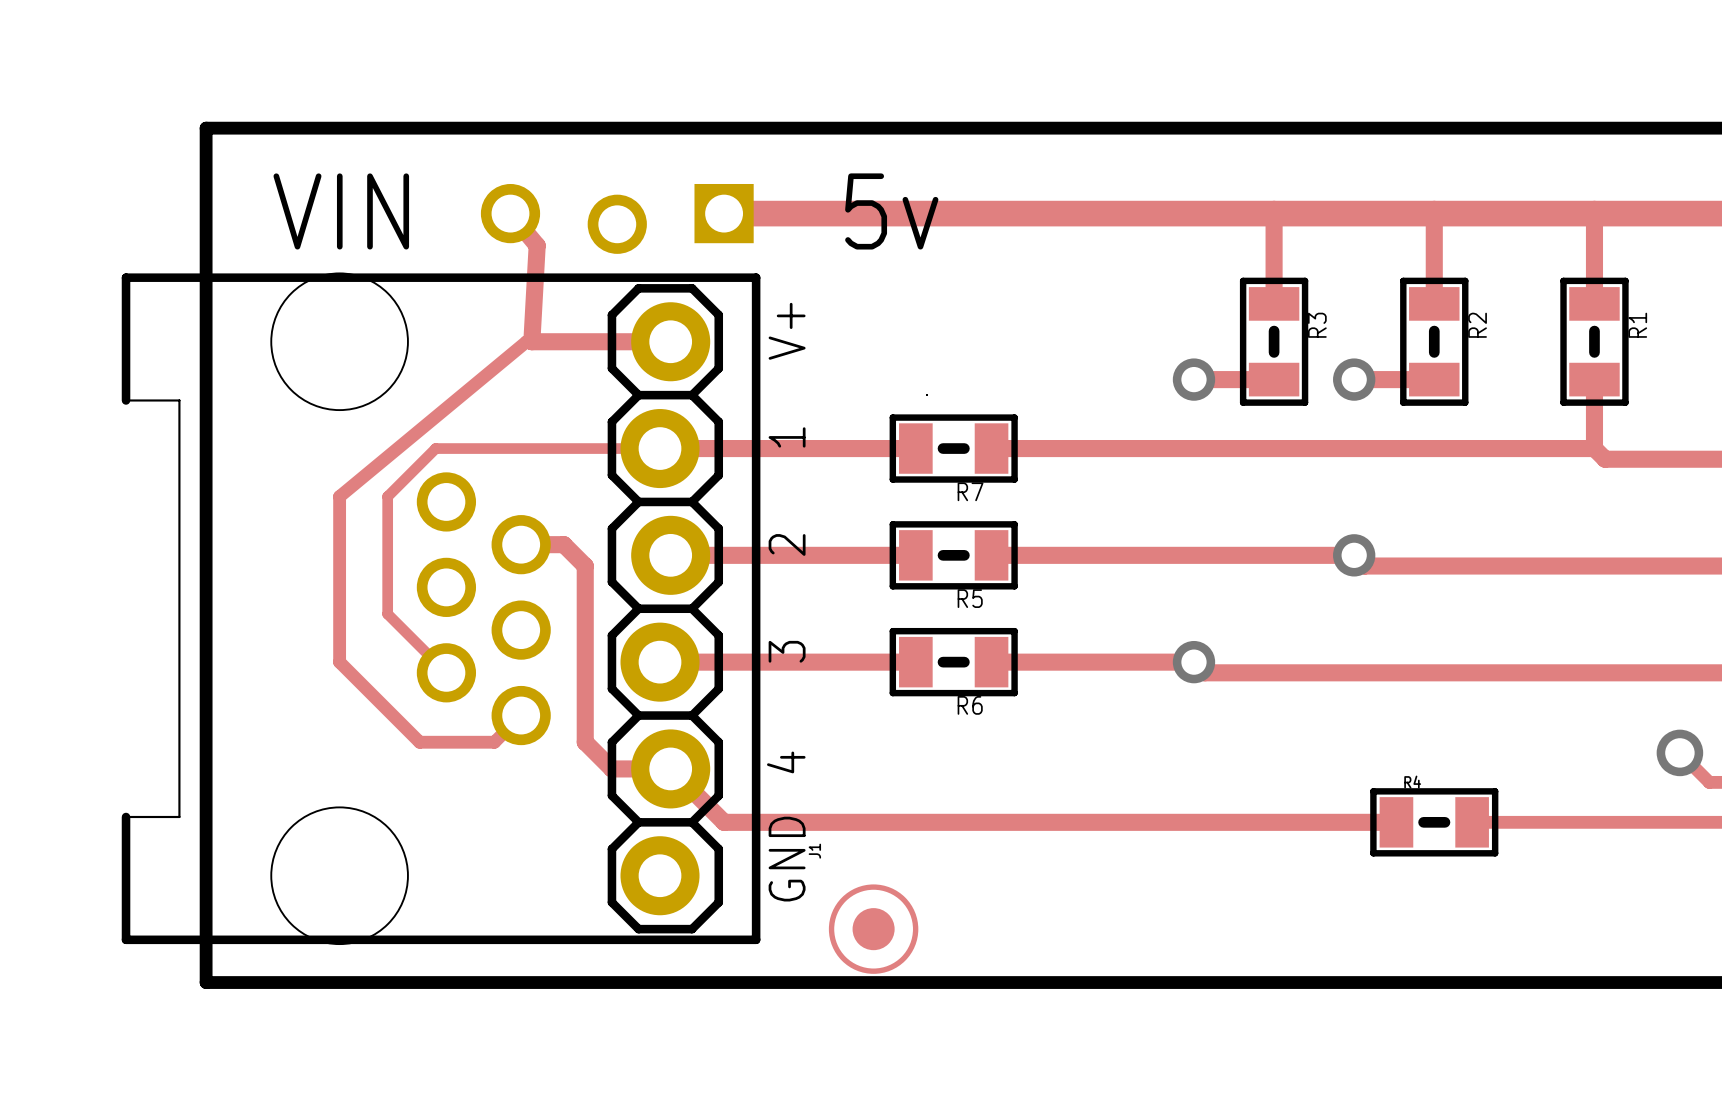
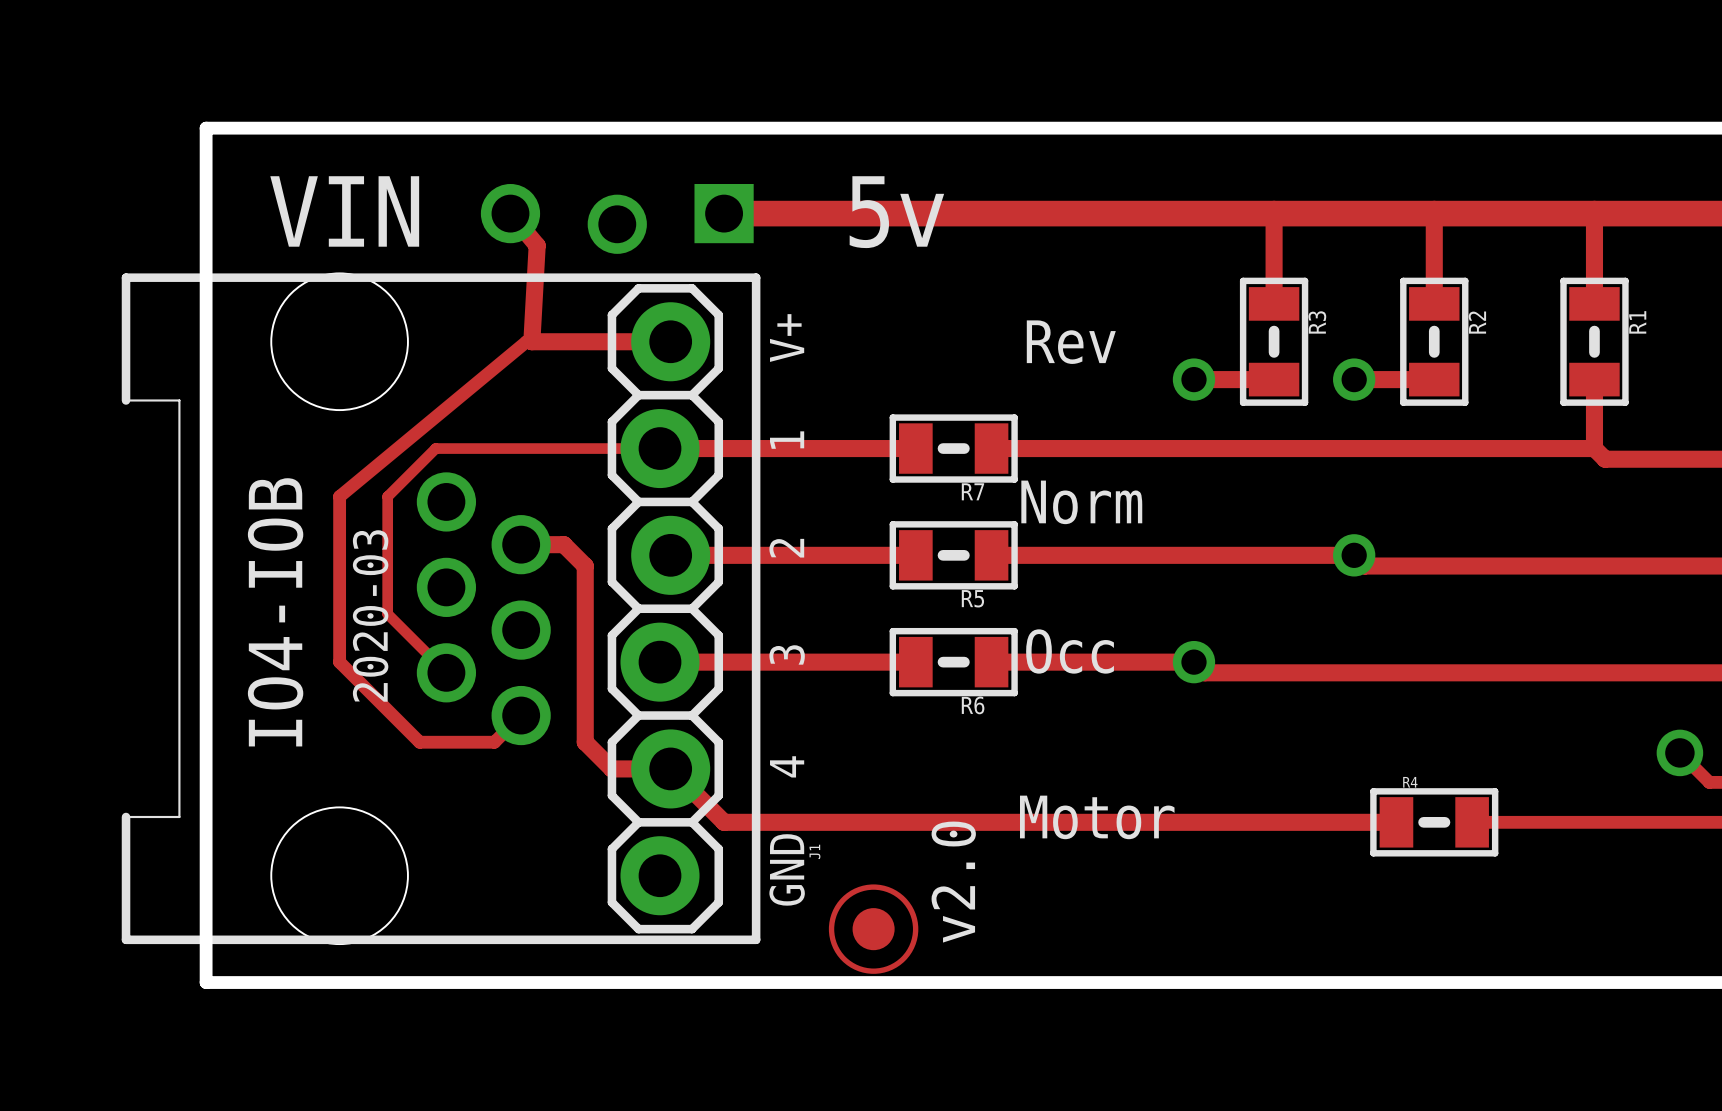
text: none -> Rev (1071, 342)
text: none -> Norm (1081, 502)
text: none -> 2020-03 (370, 615)
text: none -> IO4-IOB (275, 612)
text: none -> Occ (1070, 651)
text: none -> Motor (1097, 817)
text: none -> v2.0 (953, 882)

